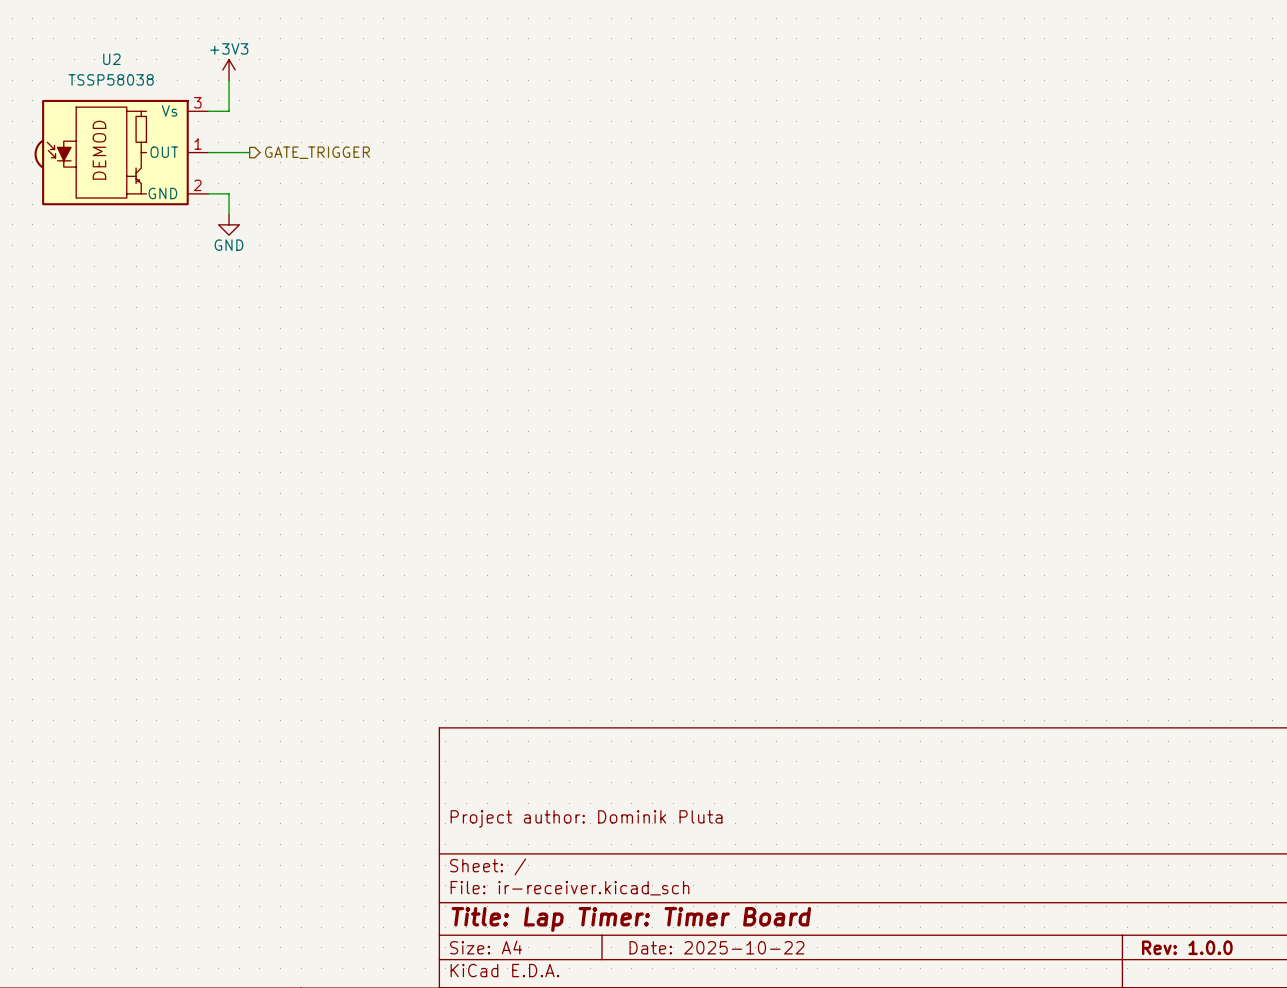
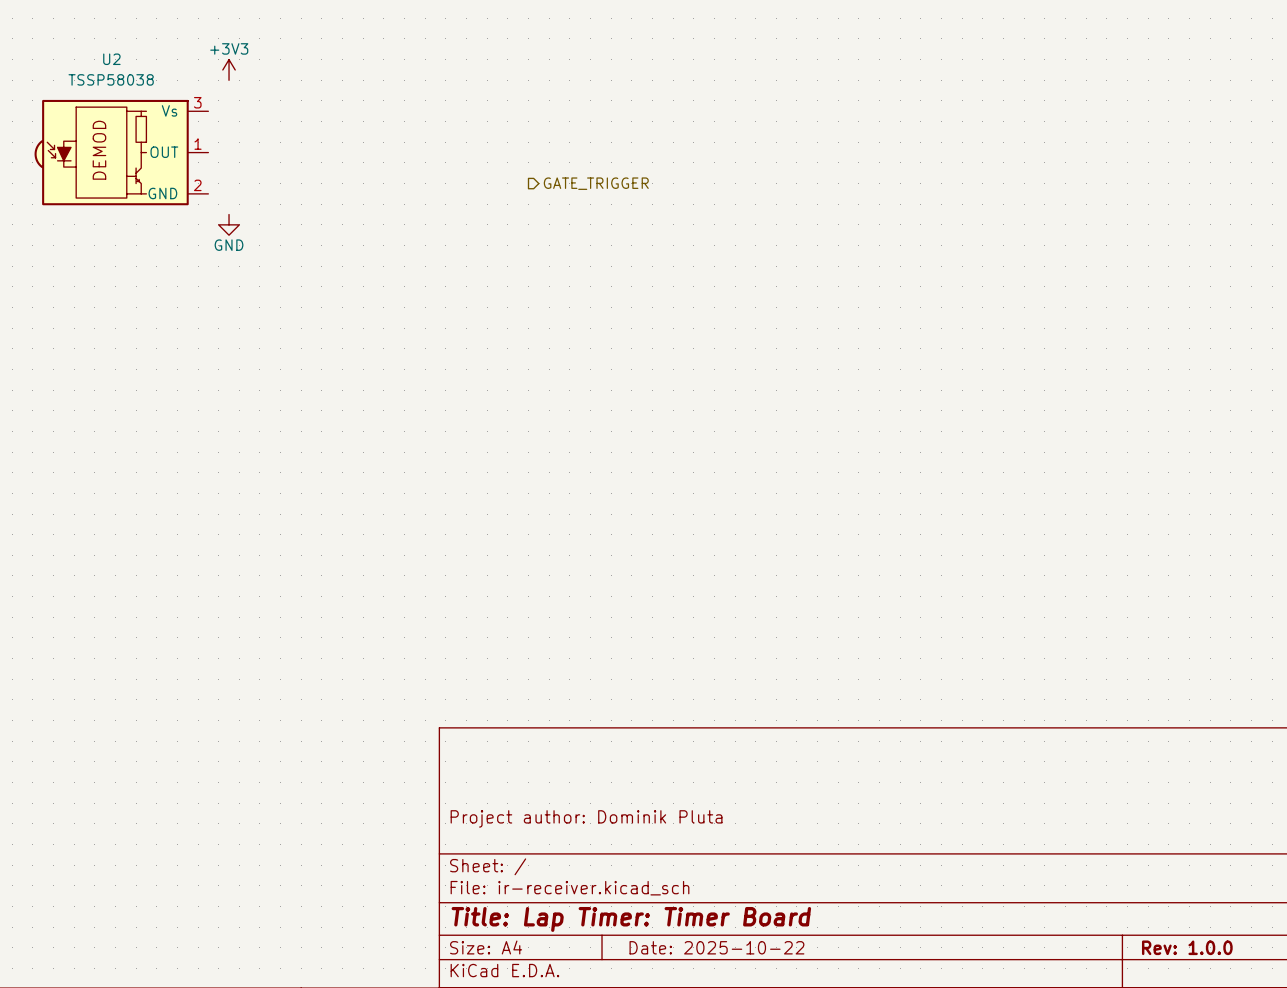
wire: (229, 80) (229, 111) (208, 111) -> none
wire: (208, 152) (249, 152) -> none
hierarchical label: GATE_TRIGGER (317, 152) -> none
hierarchical label: none -> GATE_TRIGGER (596, 183)
wire: (208, 193) (229, 193) (229, 214) -> none

